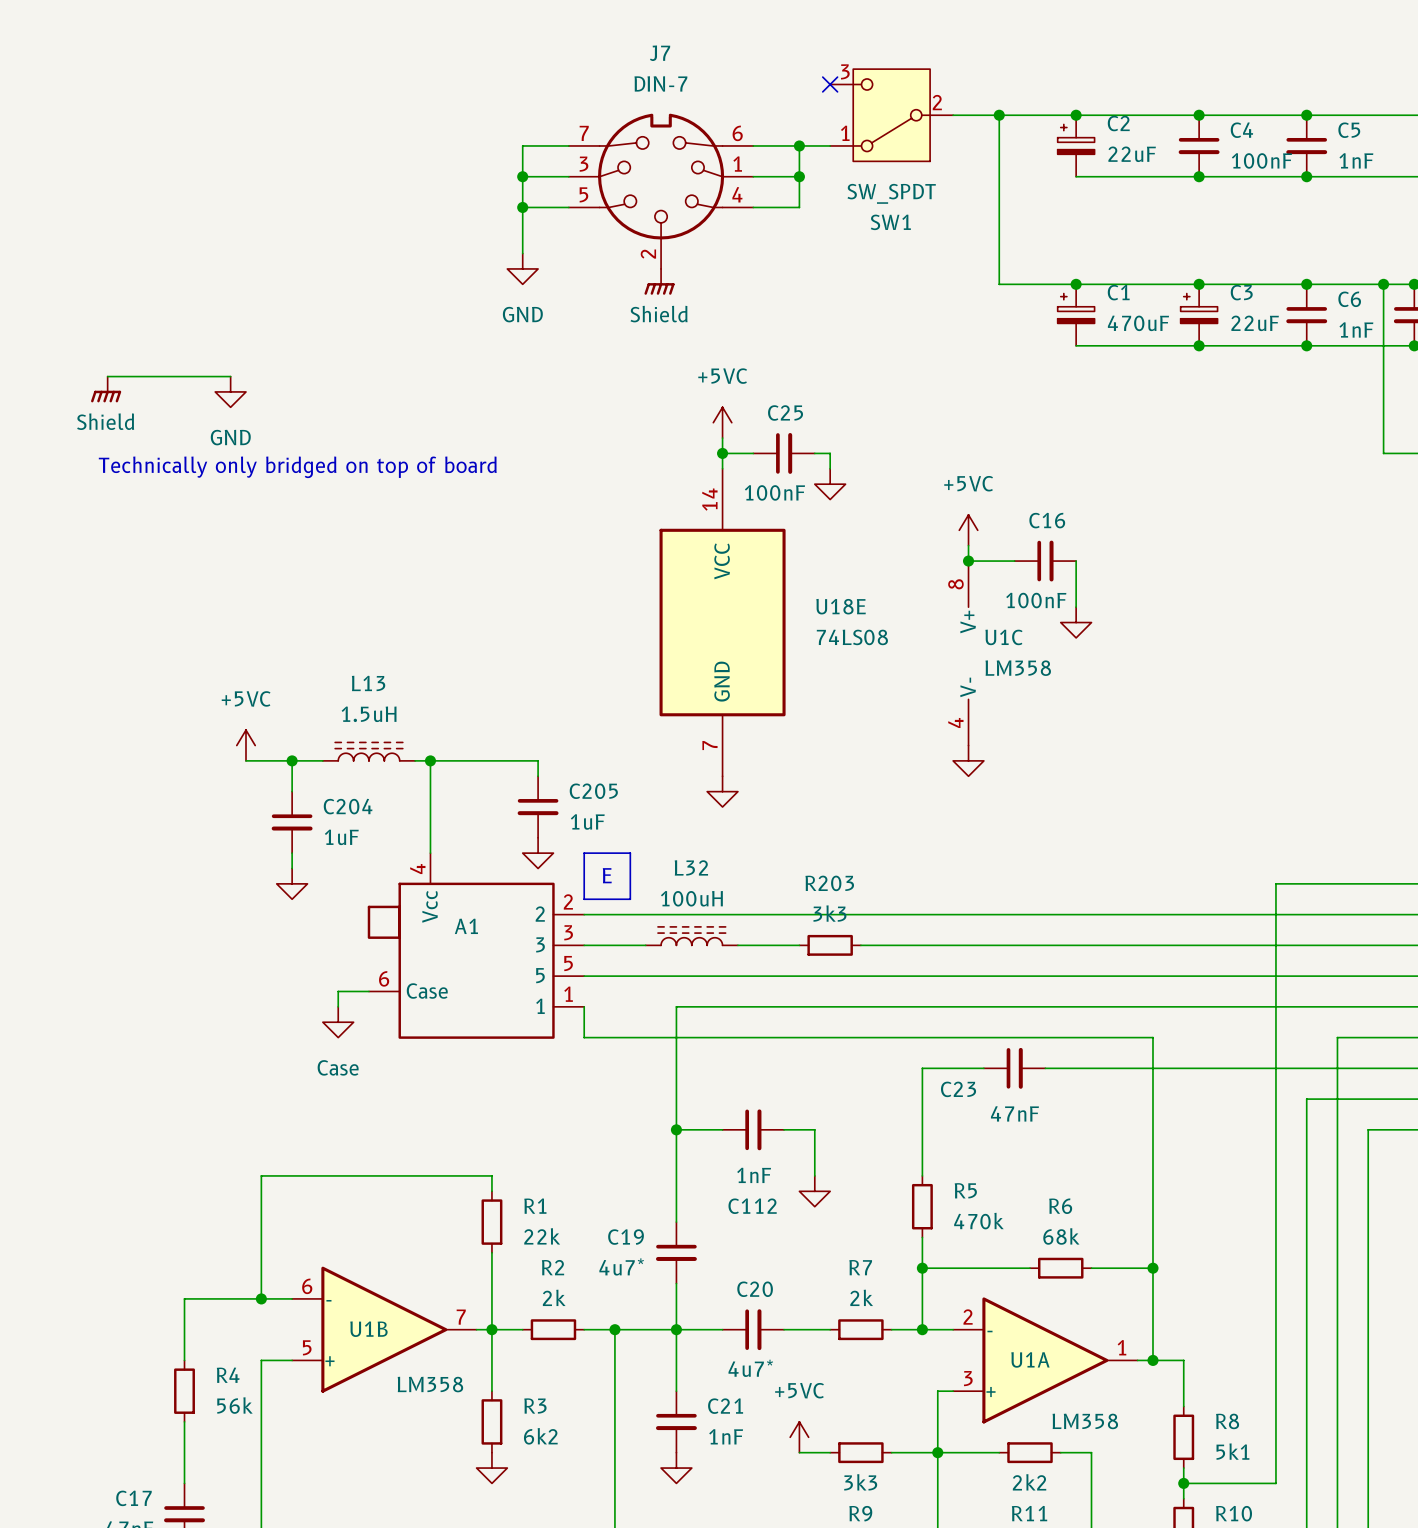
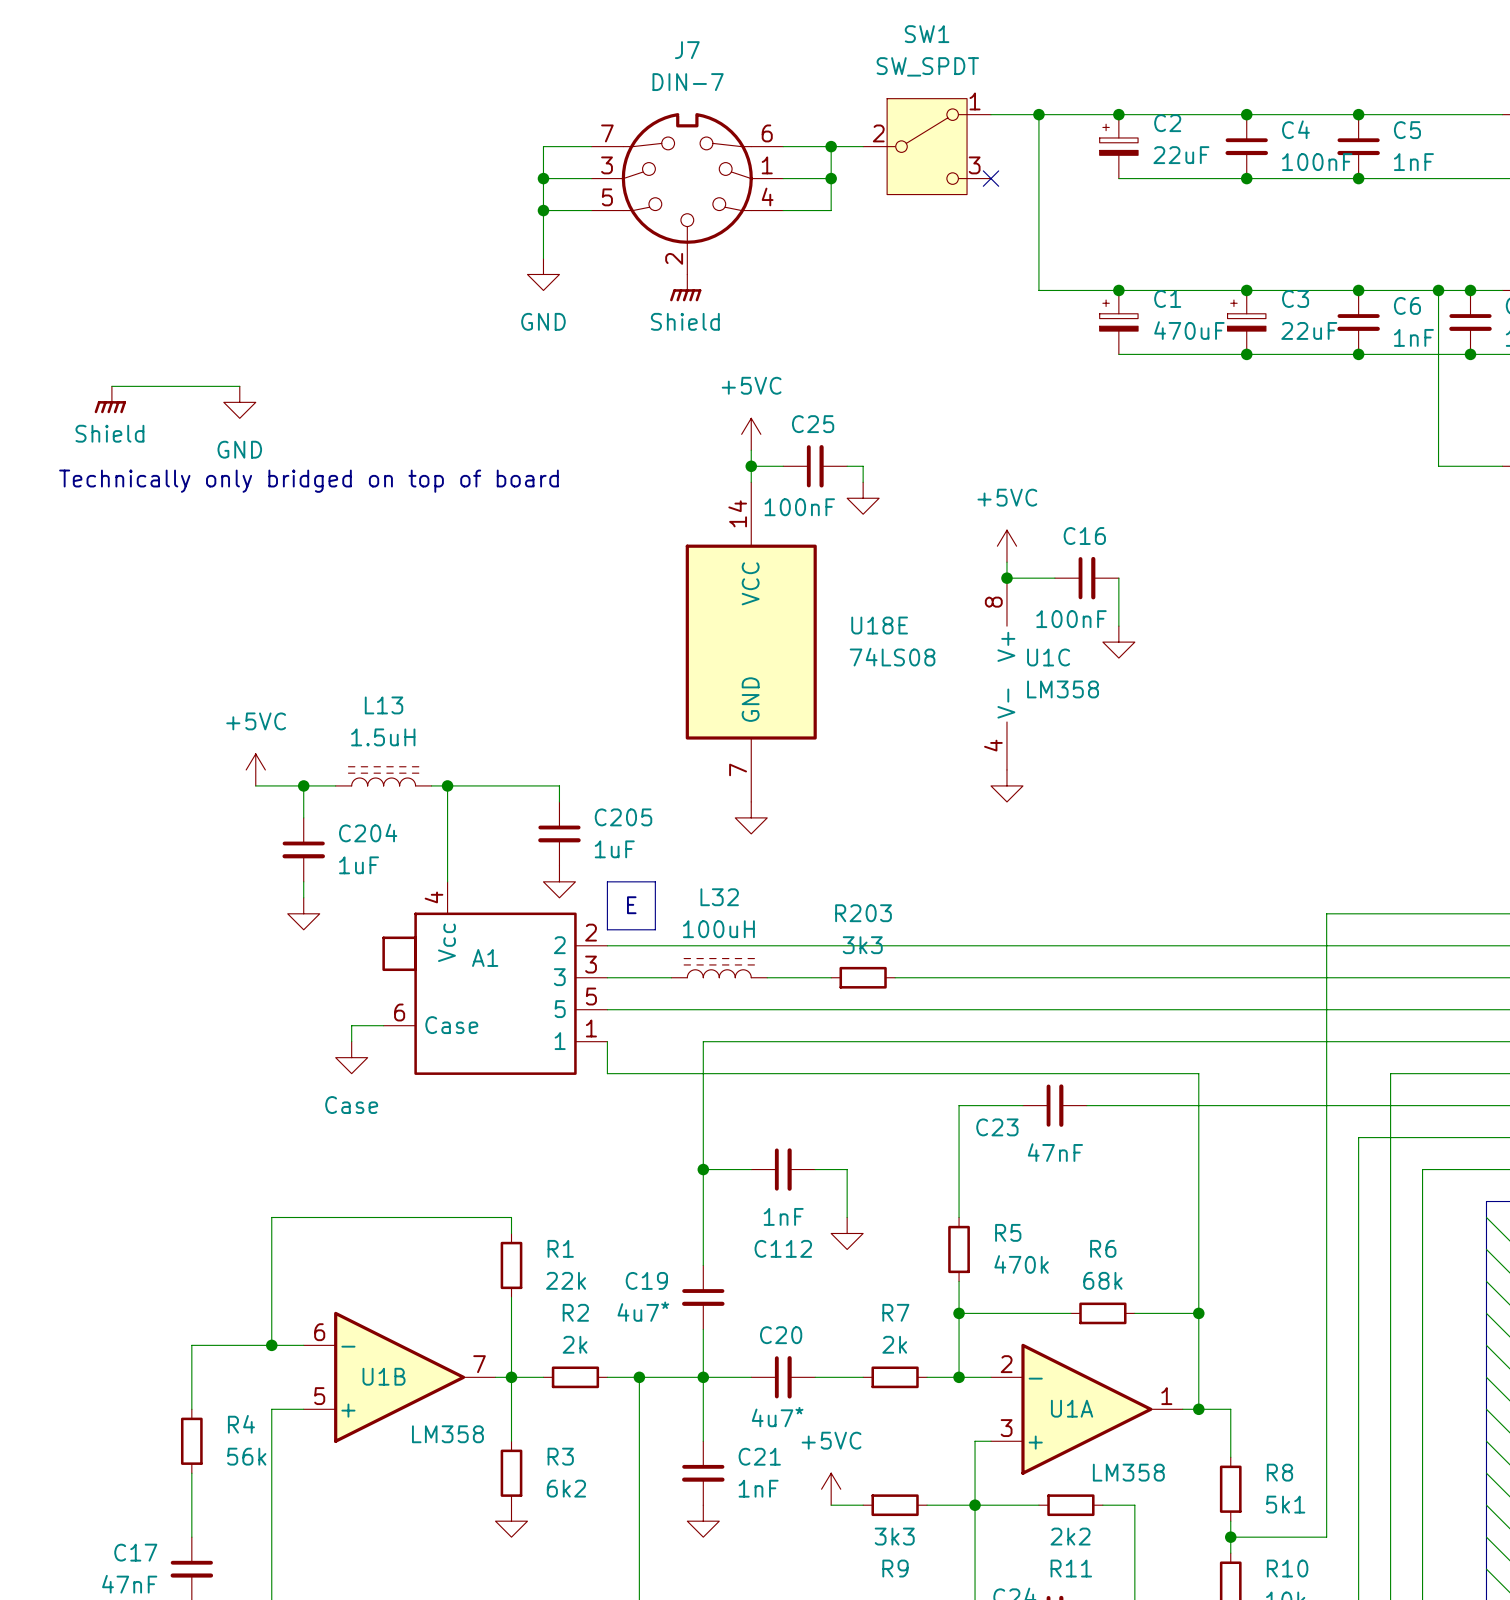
no-connect mark: (830, 84) -> none
SW1 rotation: 0° (891, 115) -> 180° (927, 146)
no-connect mark: none -> (991, 178)

